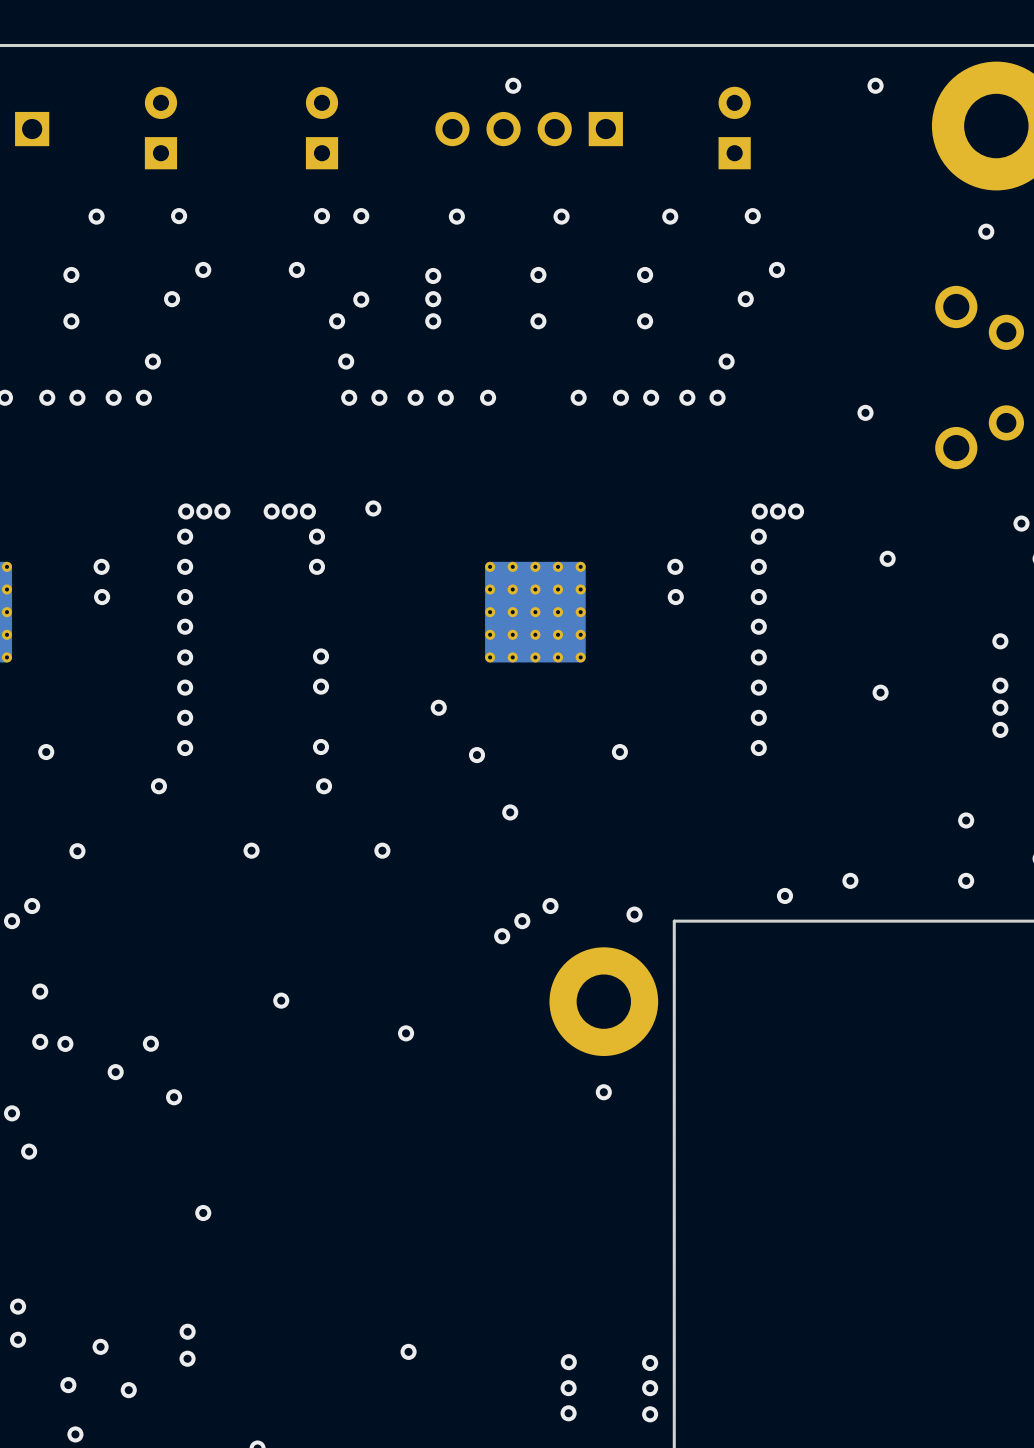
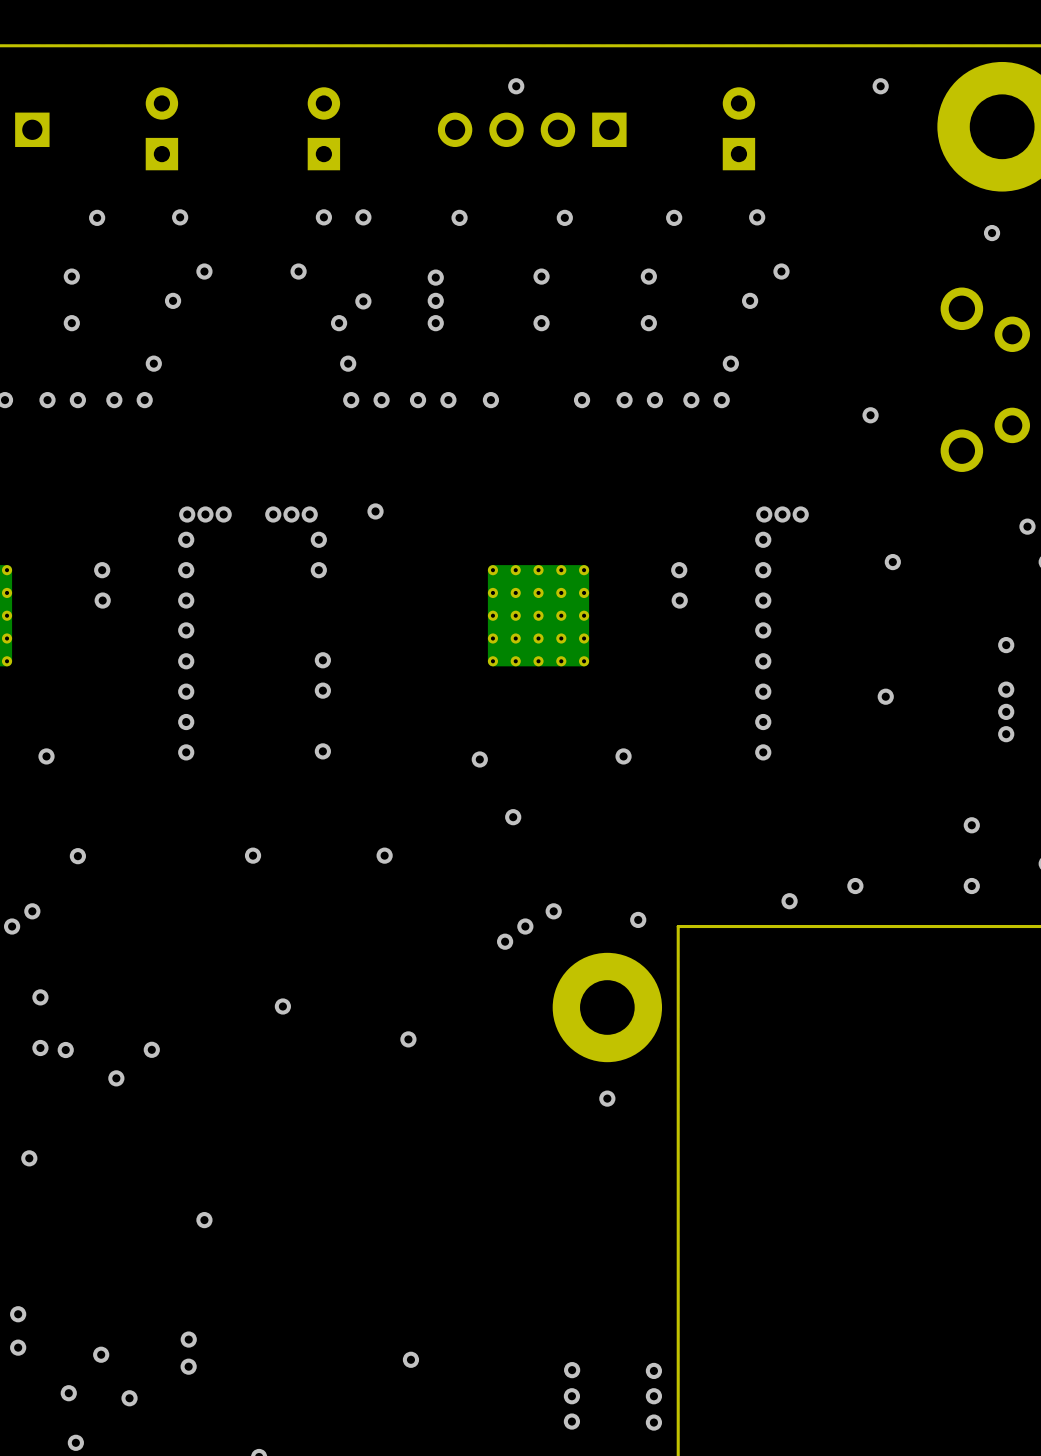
via: (438, 707) -> none
via: (158, 786) -> none
via: (324, 786) -> none
via: (174, 1097) -> none
via: (12, 1113) -> none

